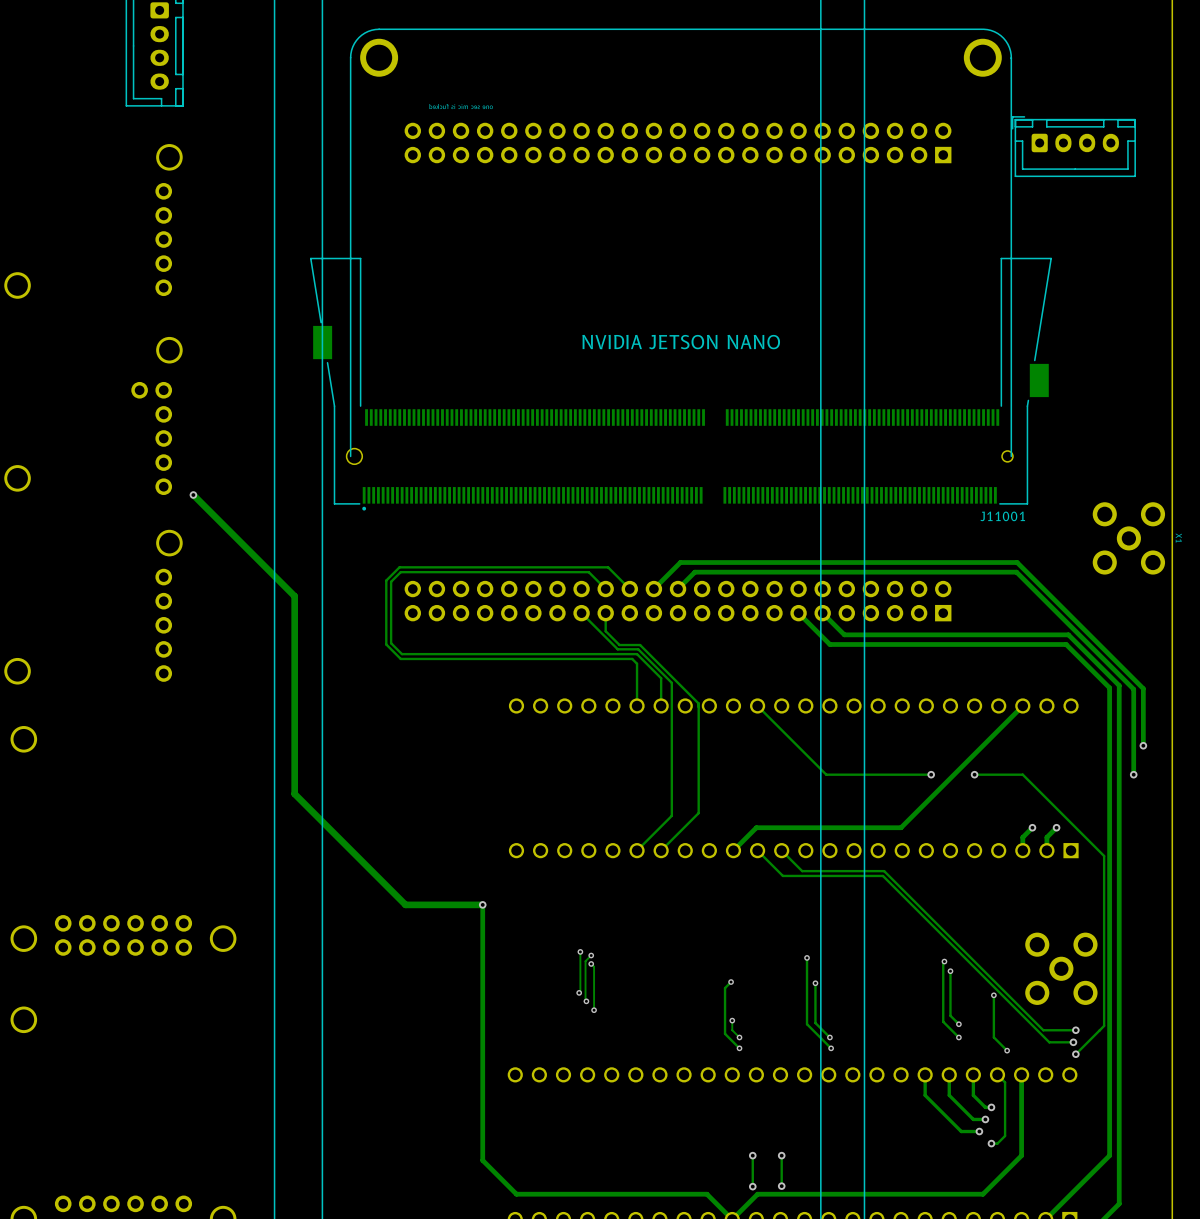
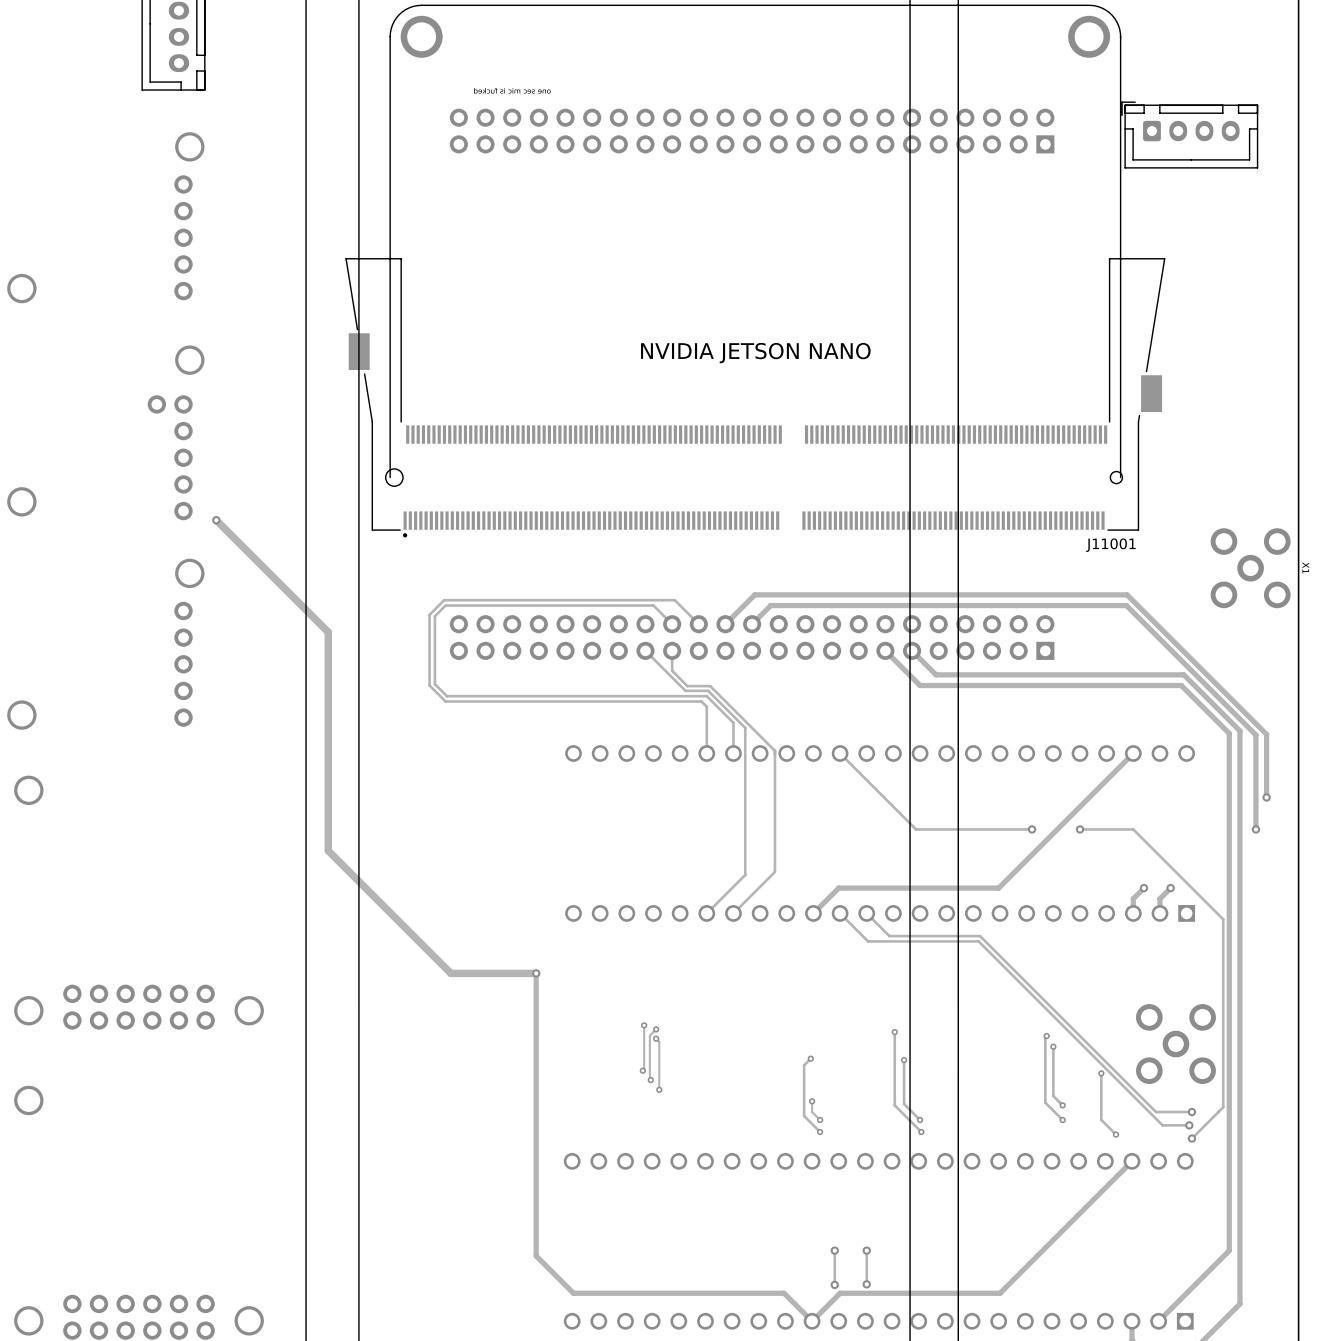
track: (925, 1074) (925, 1095) (961, 1131) (979, 1131) -> none
track: (949, 1074) (949, 1095) (973, 1119) (985, 1119) -> none
track: (973, 1074) (973, 1095) (985, 1107) (991, 1107) -> none
track: (997, 1074) (1005, 1082) (1005, 1135) (997, 1143) (991, 1143) -> none
track: (1021, 1074) (1021, 1155) (983, 1194) (902, 1194) -> (1131, 1161) (1000, 1293)
via: (991, 1107) -> none
via: (985, 1119) -> none
via: (979, 1131) -> none
via: (991, 1143) -> none

